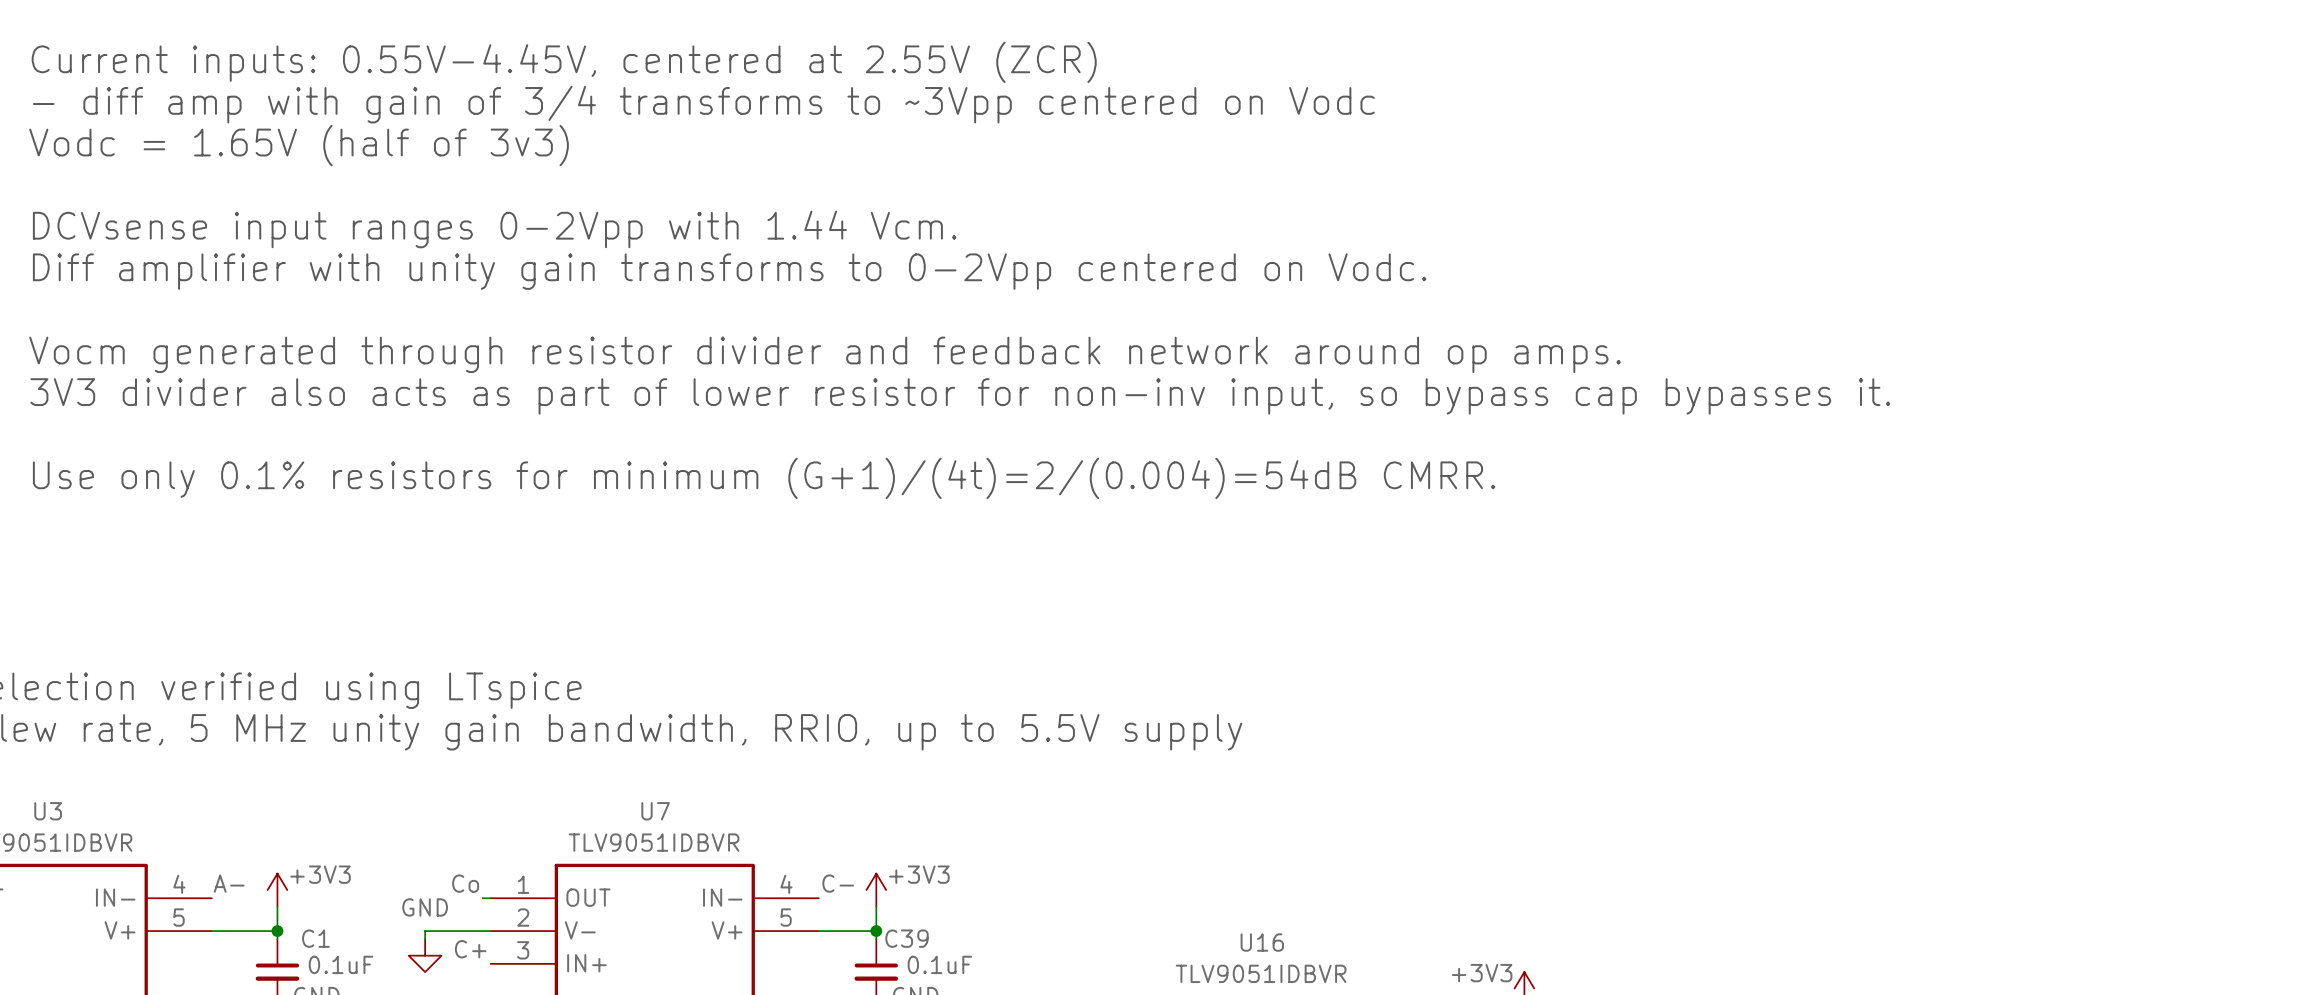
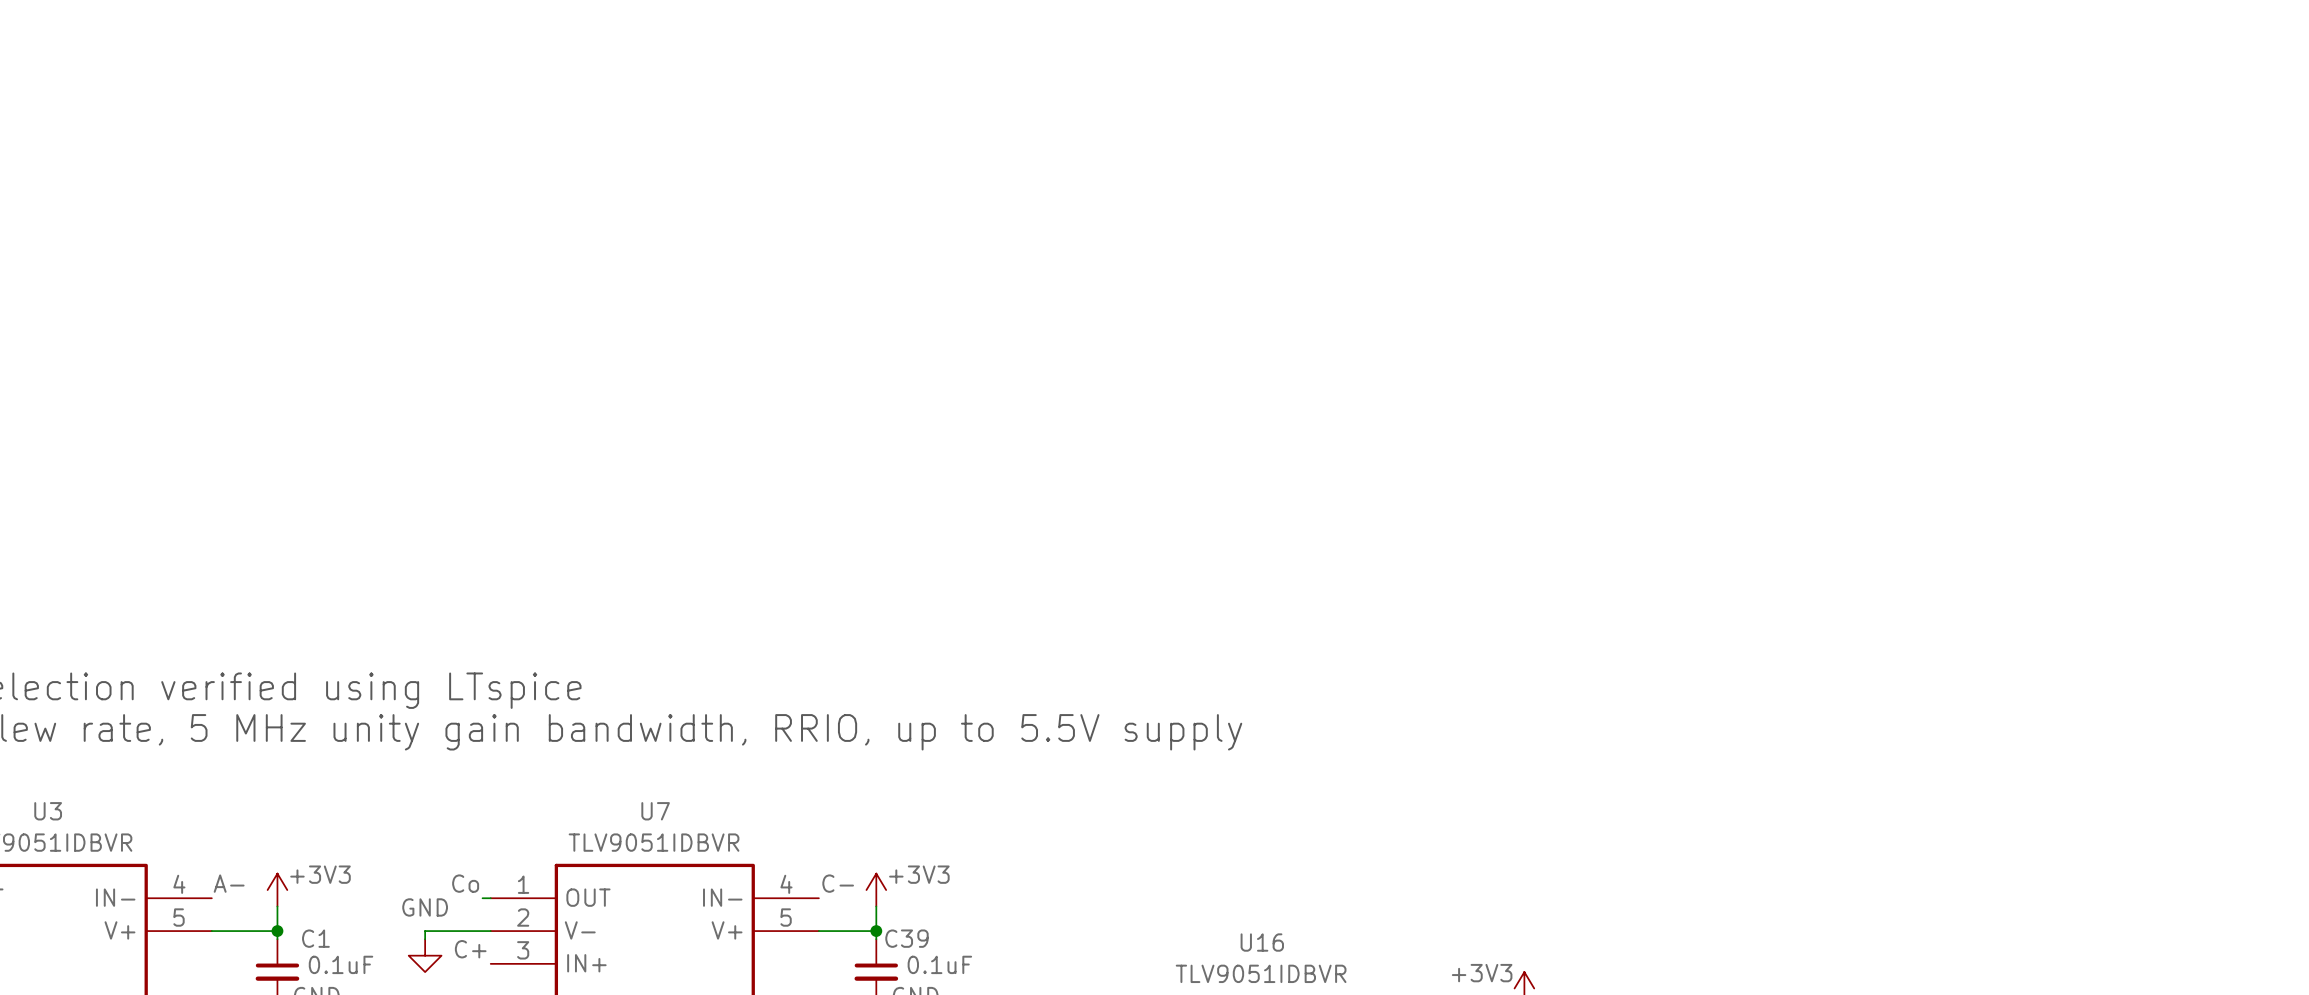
text: Current inputs: 0.55V-4.45V, centered at 2.55V (ZCR) (564, 62) -> none
text: - diff amp with gain of 3/4 transforms to ~3Vpp centered on Vodc (703, 104) -> none
text: Vodc = 1.65V (half of 3v3) (299, 145) -> none
text: DCVsense input ranges 0-2Vpp with 1.44 Vcm. (494, 229) -> none
text: Diff amplifier with unity gain transforms to 0-2Vpp centered on Vodc. (729, 271) -> none
text: Vocm generated through resistor divider and feedback network around op amps. (825, 354) -> none
text: 3V3 divider also acts as part of lower resistor for non-inv input, so bypass cap bypasses it. (960, 396) -> none
text: Use only 0.1% resistors for minimum (G+1)/(4t)=2/(0.004)=54dB CMRR. (764, 478) -> none

